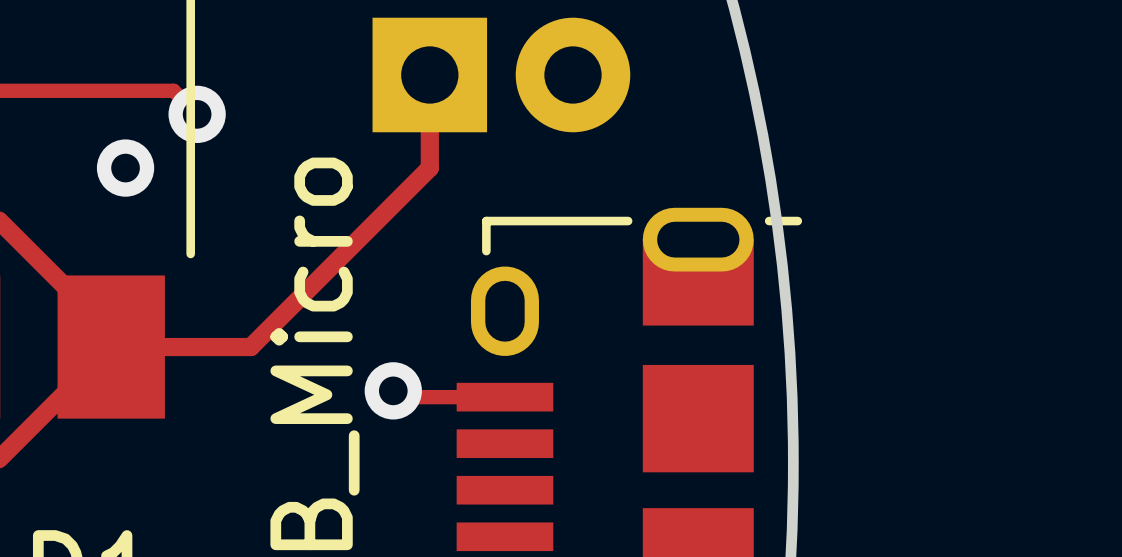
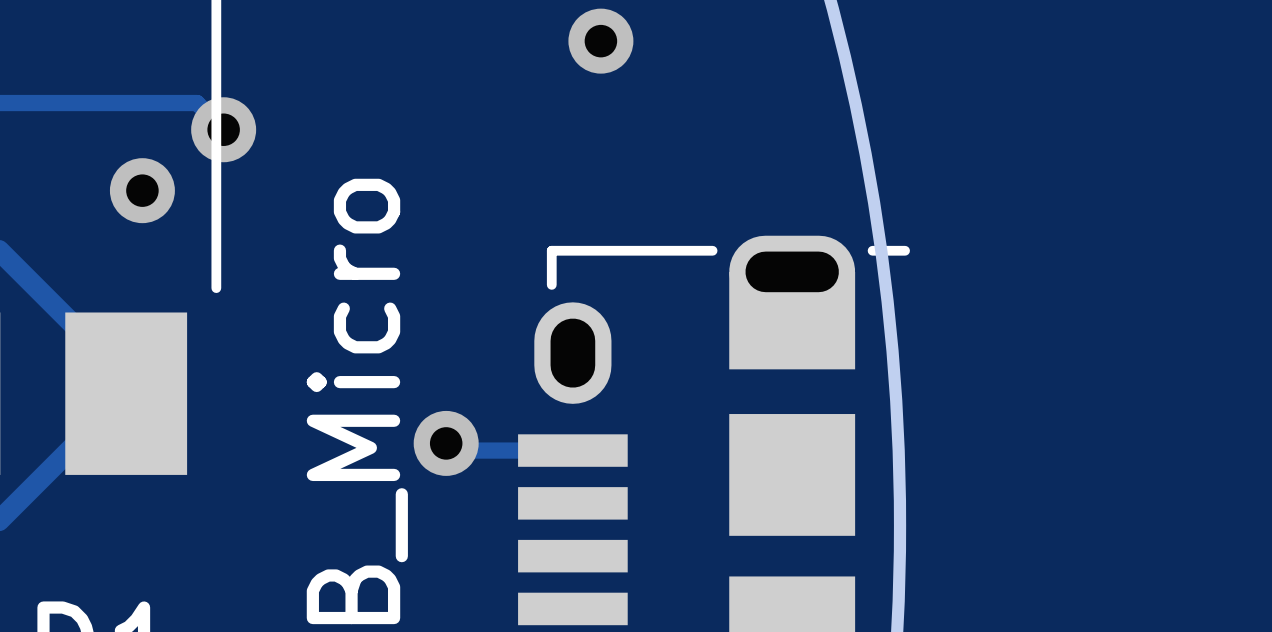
via: none -> (600, 41)
track: (429, 74) (429, 168) (250, 347) (111, 347) -> none
part: (501, 74) -> none

